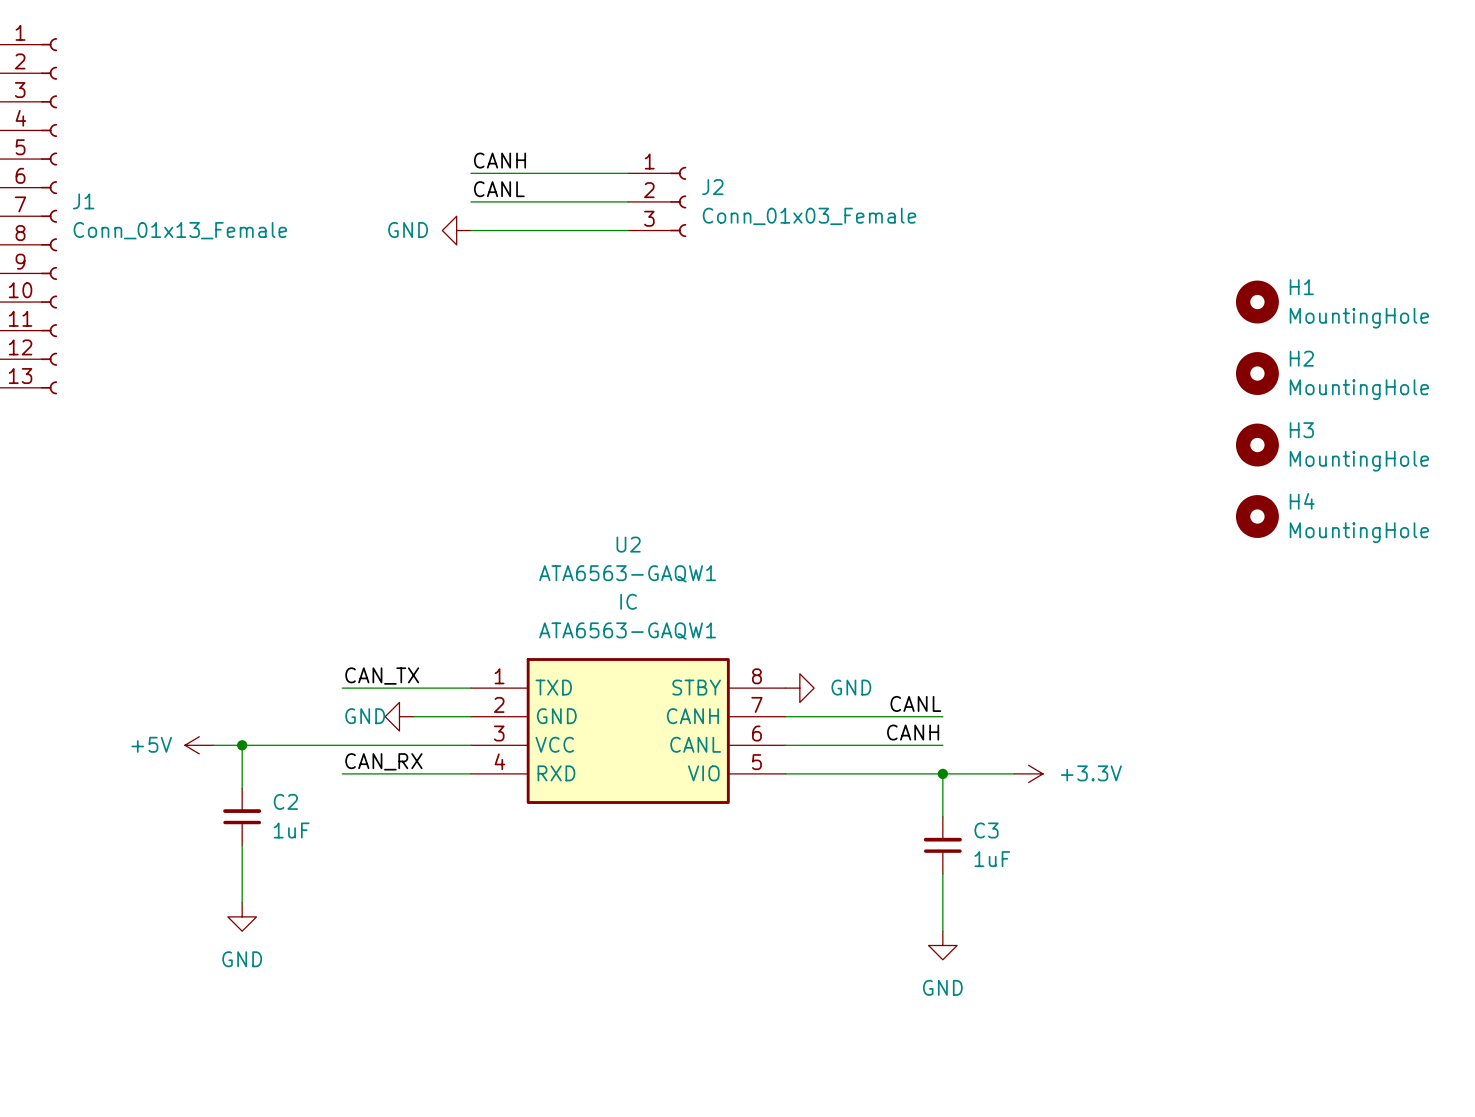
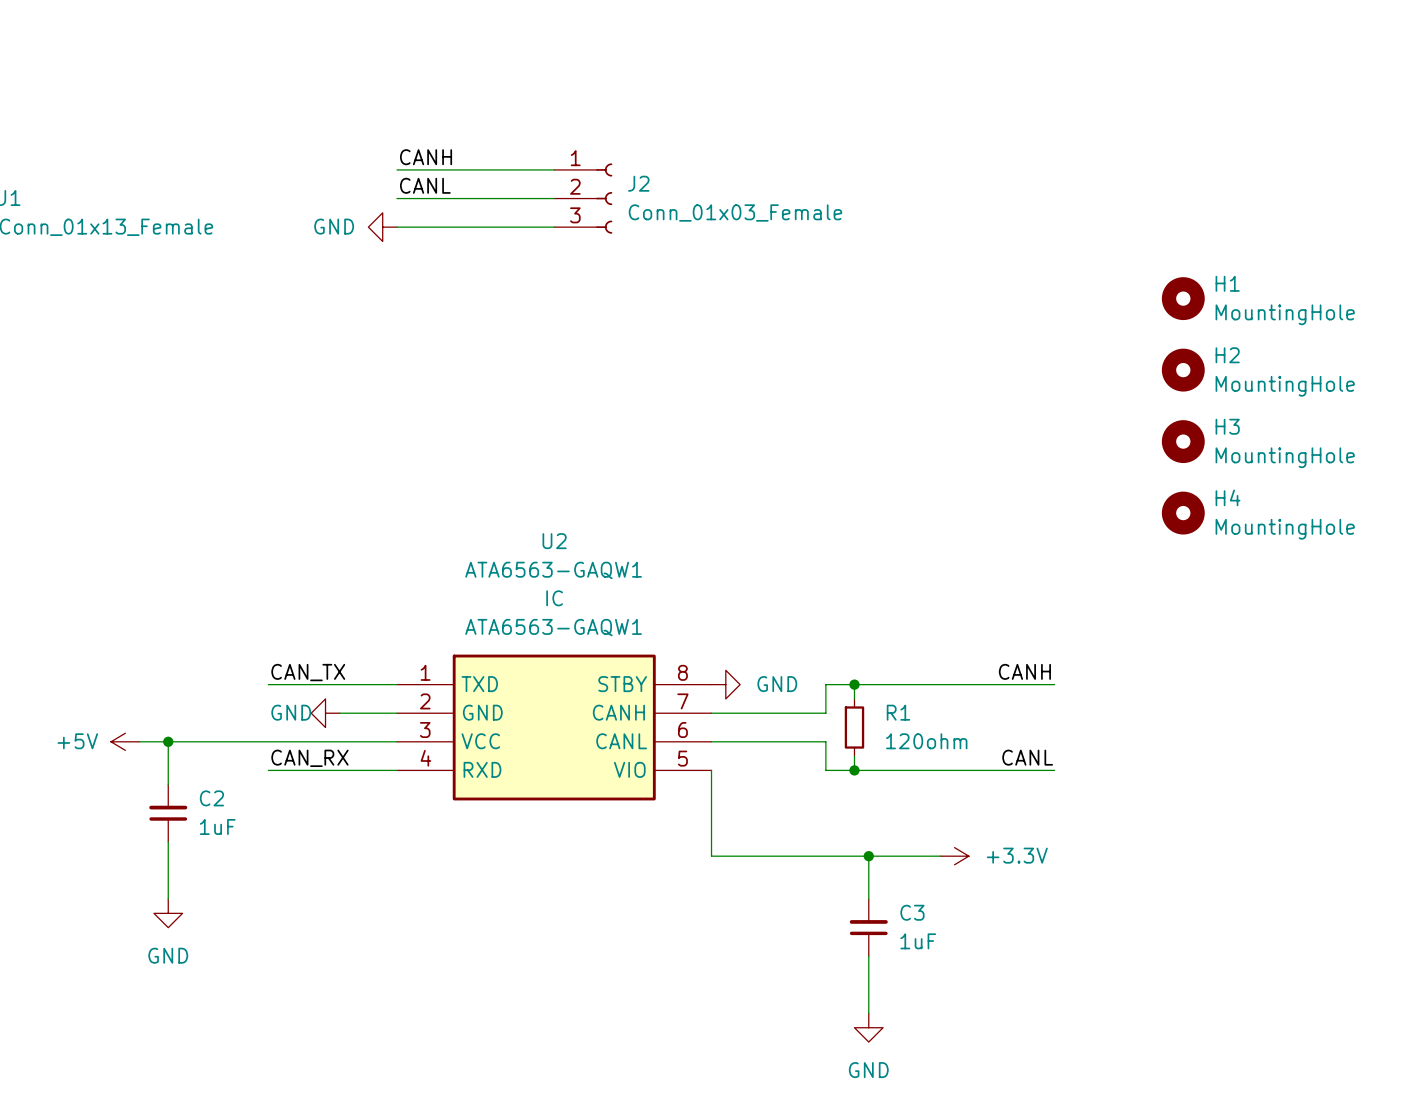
wire: none -> (854, 684) (854, 698)
junction: none -> (854, 684)
label position: CANL (915, 703) -> CANL (1027, 757)
wire: (899, 716) (942, 716) -> (825, 713) (825, 684) (1054, 684)
R1: none -> 120ohm (854, 727)
label position: CANH (913, 732) -> CANH (1024, 671)
wire: (899, 745) (942, 745) -> (825, 741) (825, 770)
wire: none -> (854, 756) (854, 770)
wire: (785, 773) (899, 773) -> (711, 770) (711, 856) (940, 856)
wire: (942, 773) (942, 816) -> none
junction position: (942, 773) -> (854, 770)
wire: none -> (940, 770) (1054, 770)
power symbol position: +3.3V (1028, 773) -> +3.3V (954, 856)
C3 position: (942, 845) -> (868, 927)
junction: none -> (868, 856)
power symbol position: GND (942, 945) -> GND (868, 1027)
wire: none -> (868, 956) (868, 1013)

